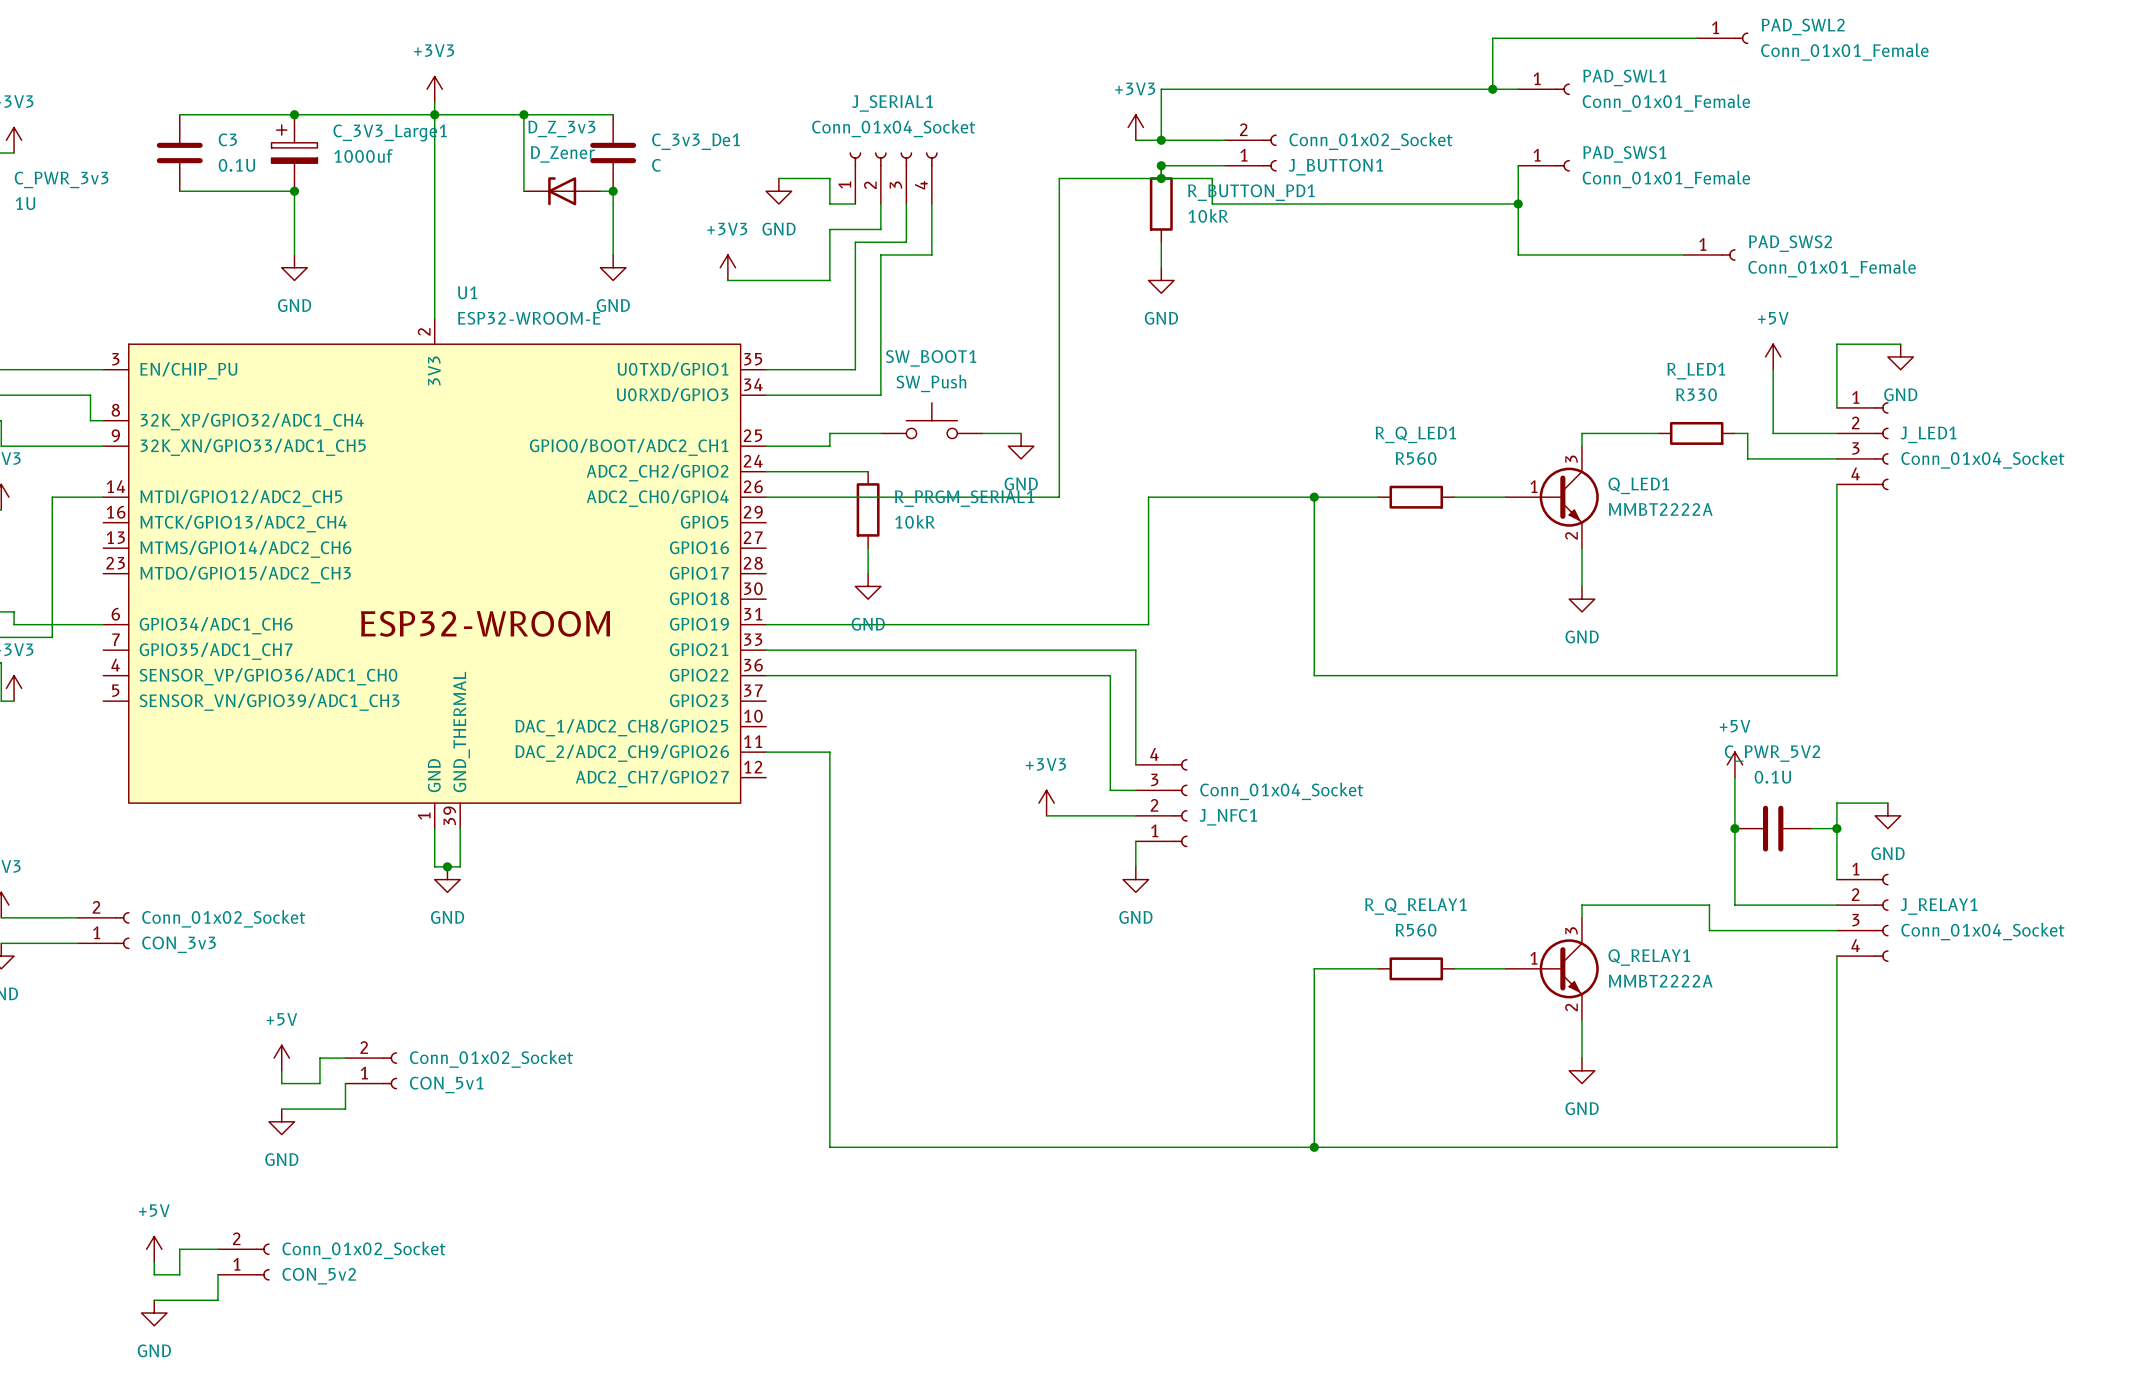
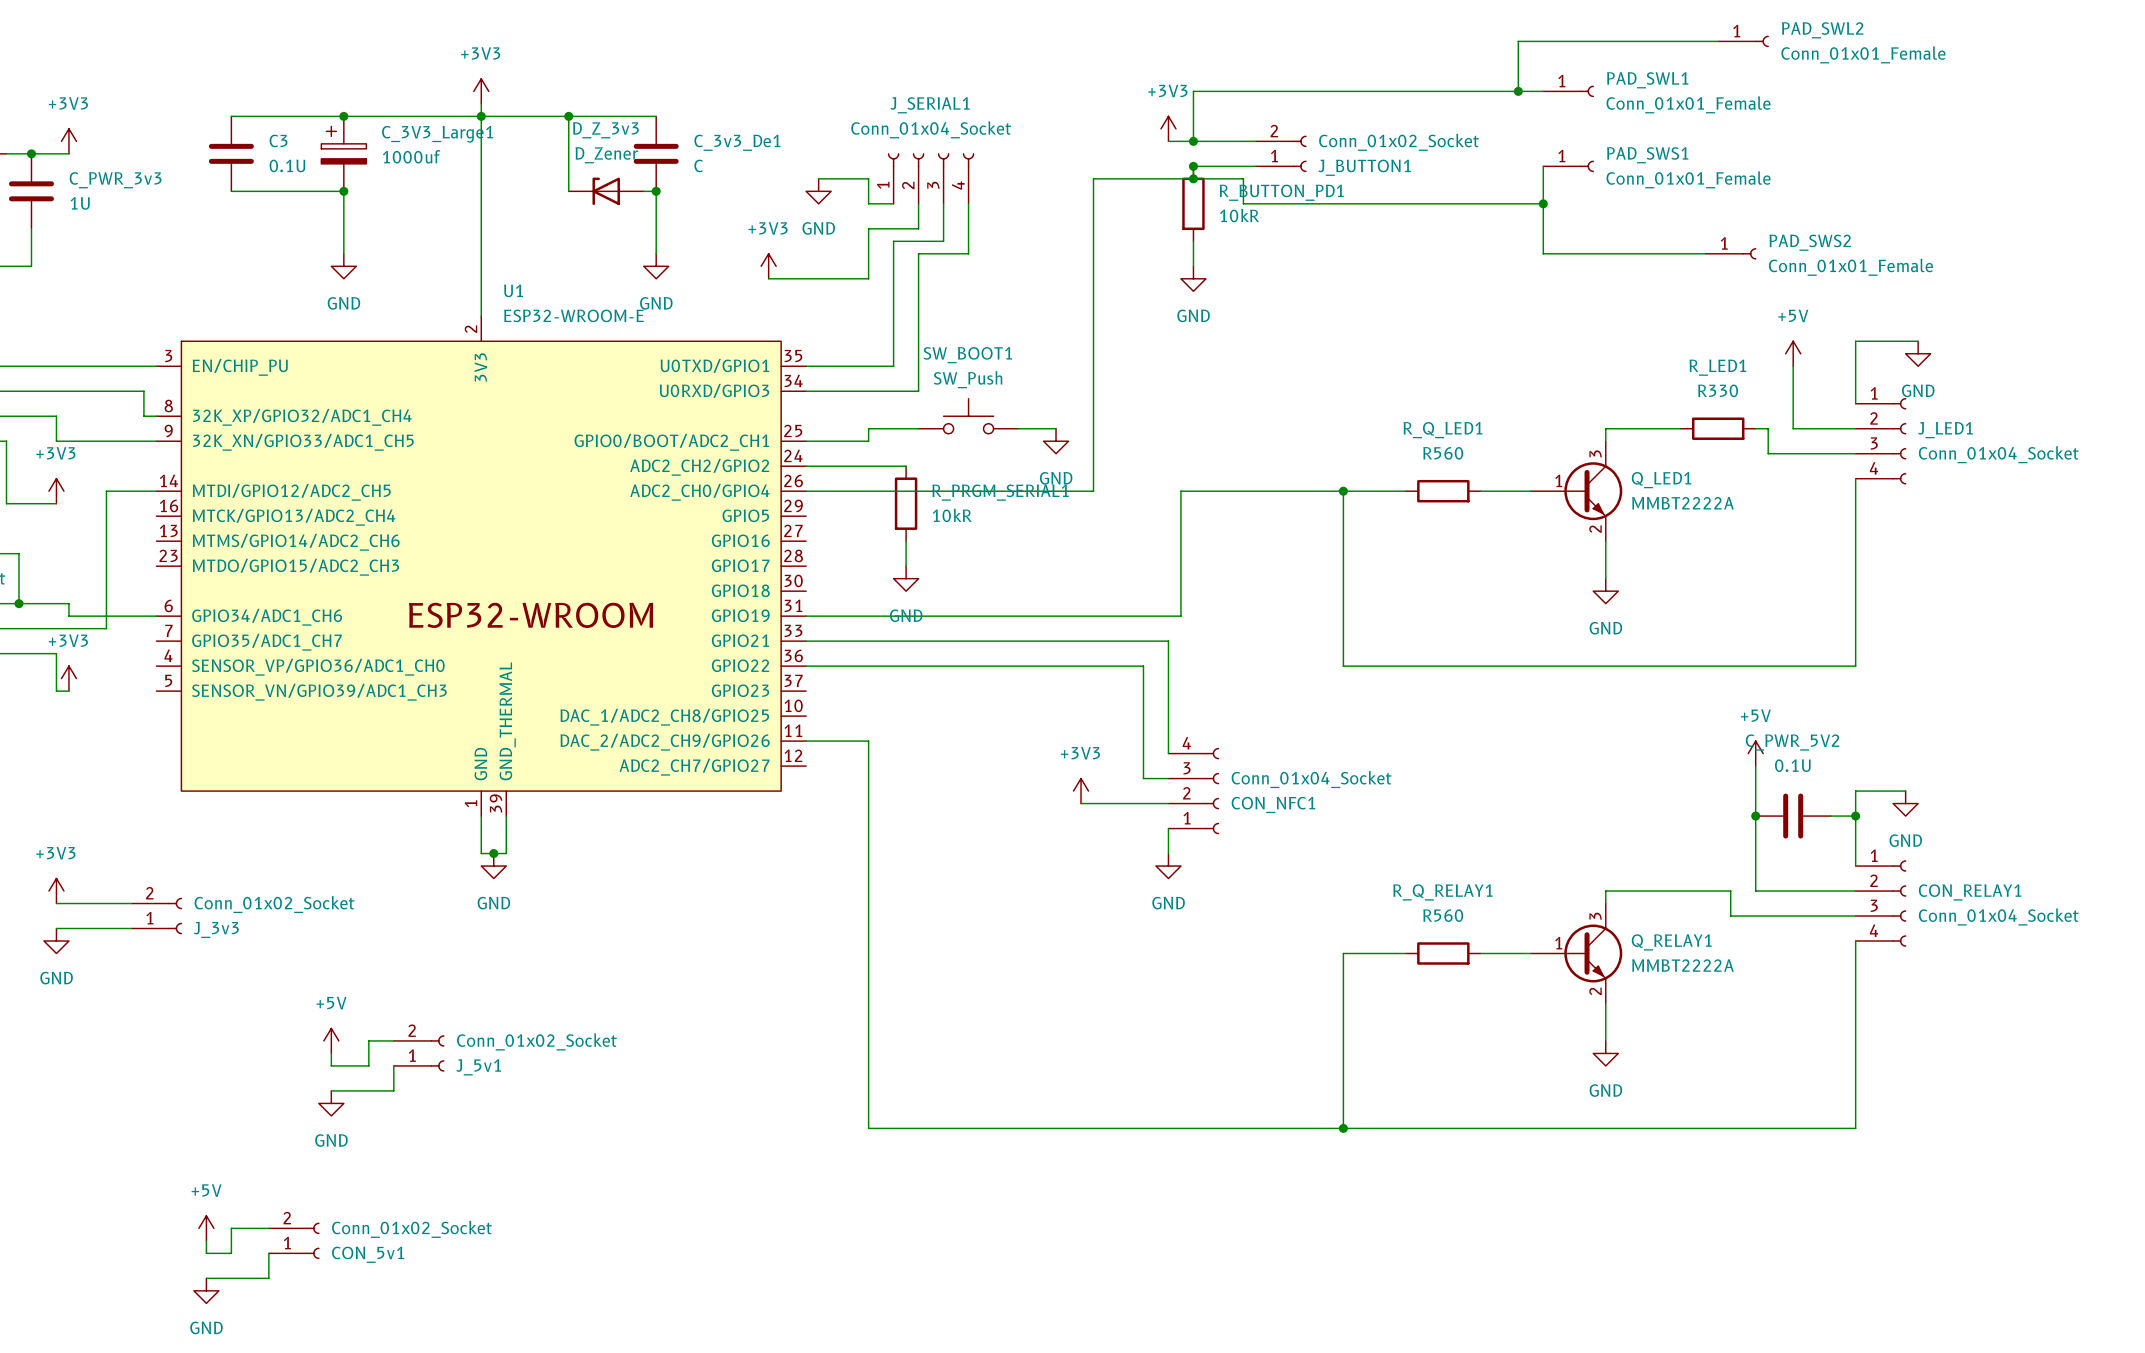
J_NFC1 name: J_NFC1 (1228, 817) -> CON_NFC1 (1273, 804)
J_RELAY1 name: J_RELAY1 (1939, 906) -> CON_RELAY1 (1970, 892)
CON_3v3 name: CON_3v3 (179, 944) -> J_3v3 (216, 929)
CON_5v1 name: CON_5v1 (446, 1085) -> J_5v1 (478, 1067)
CON_5v2 name: CON_5v2 (319, 1276) -> CON_5v1 (368, 1254)

